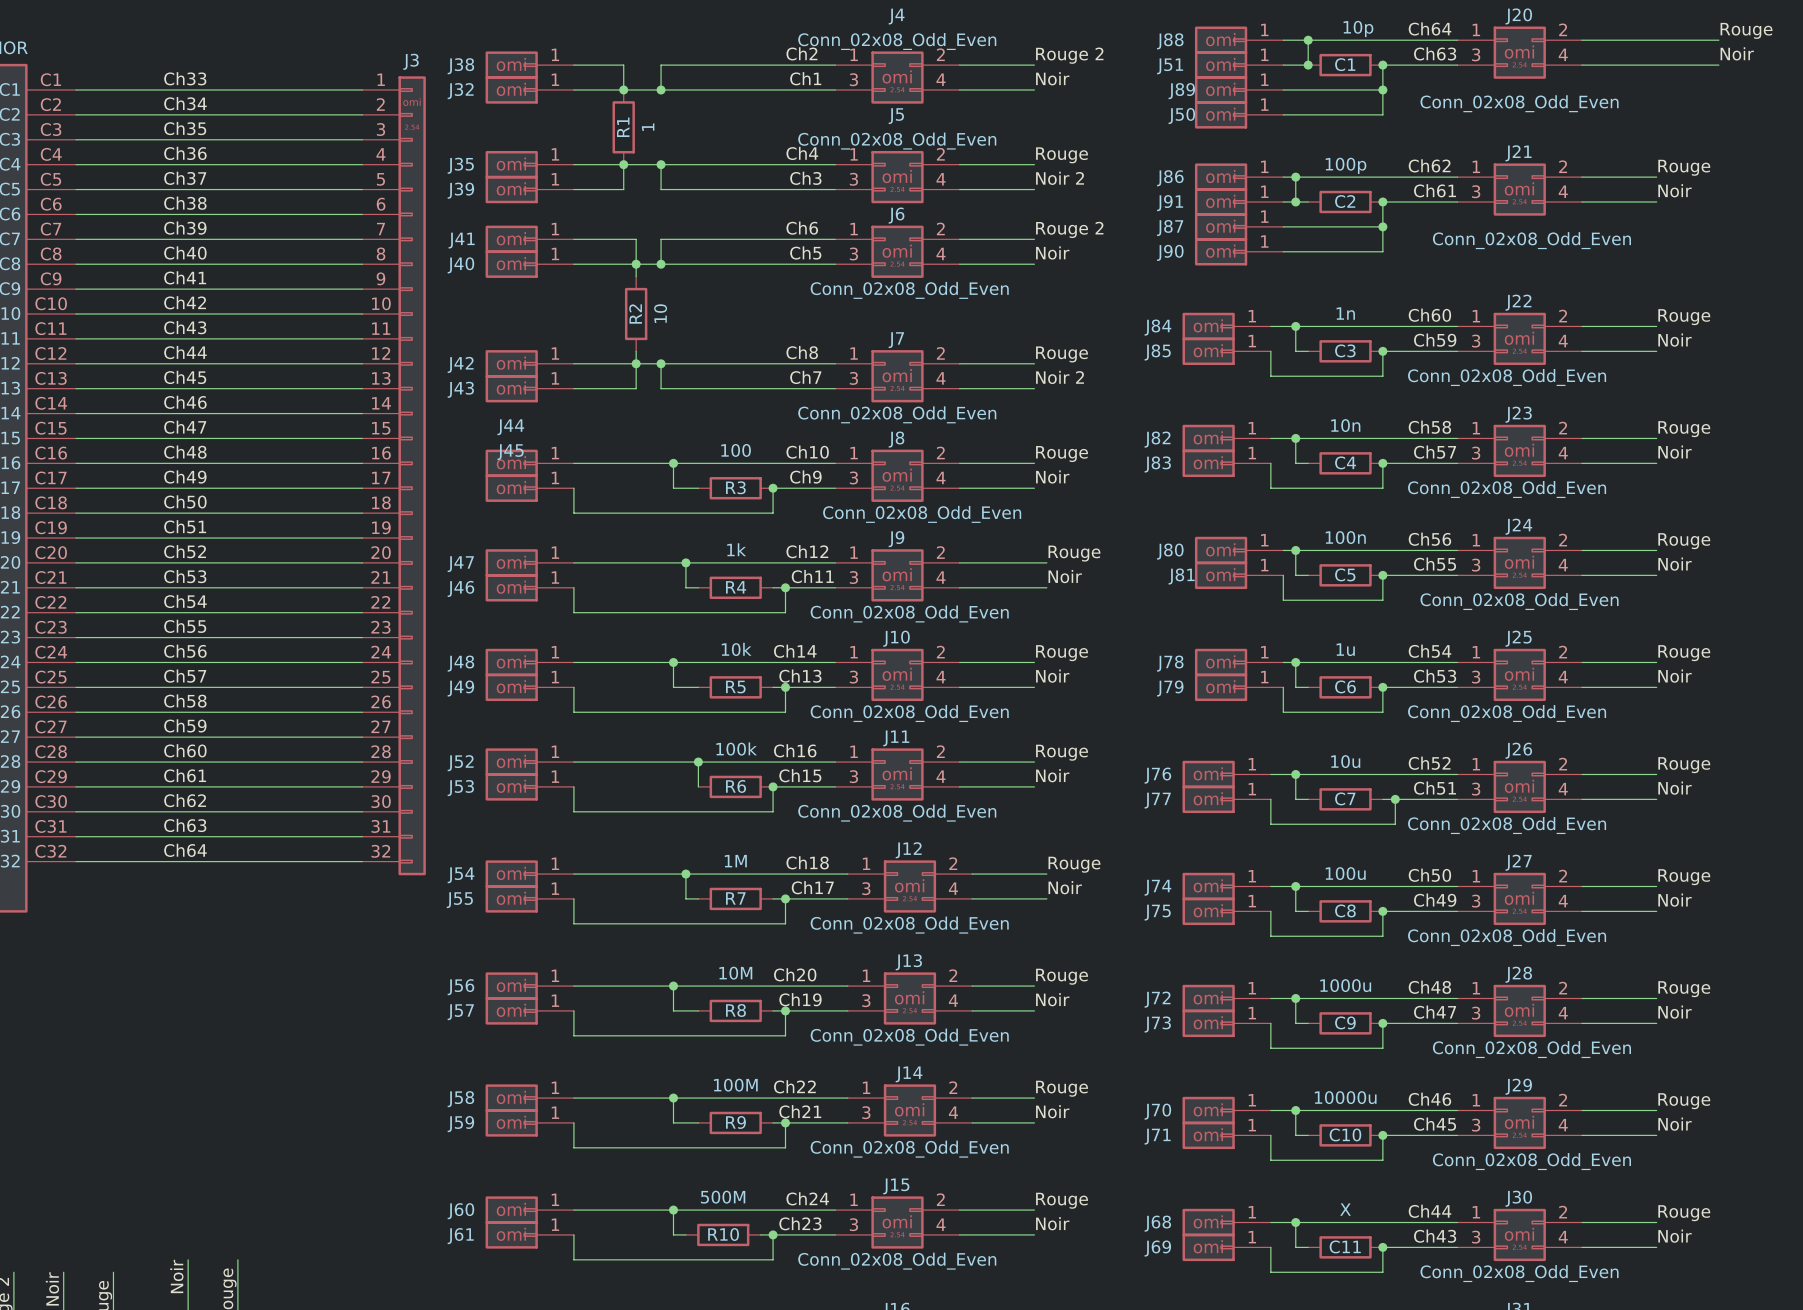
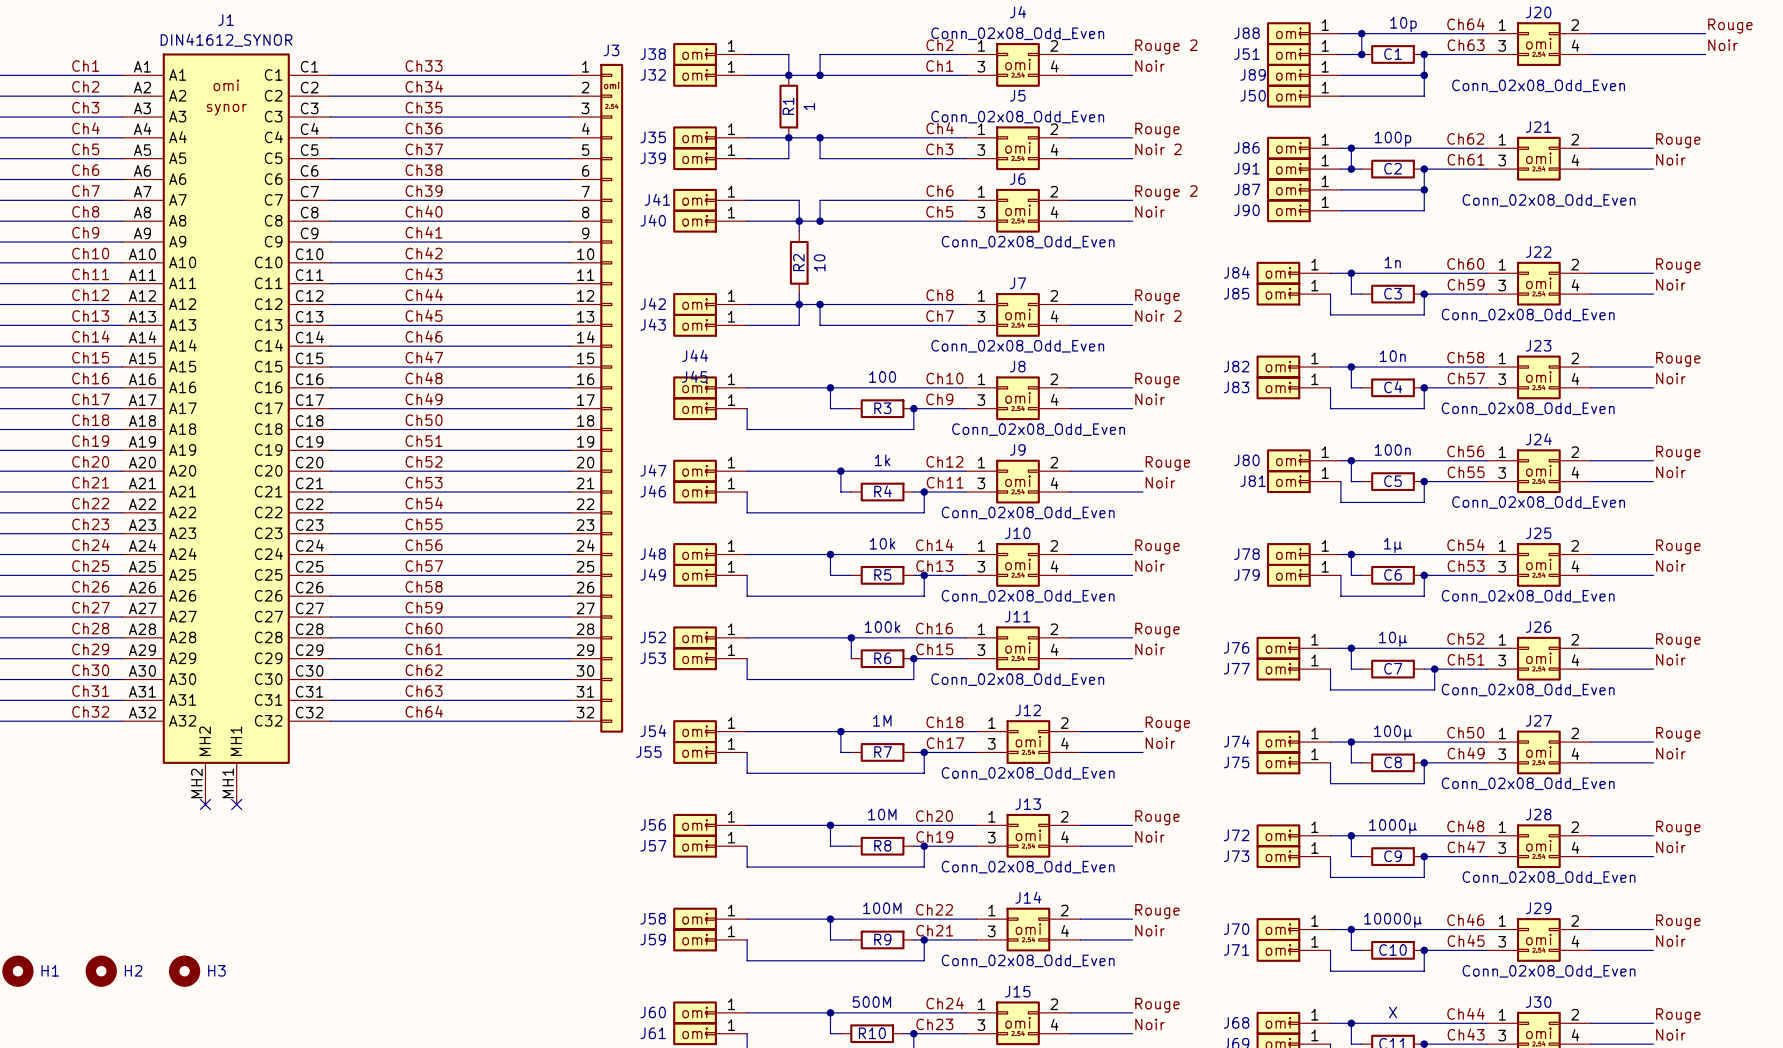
C6 value: 1u (1345, 649) -> 1µ (1393, 545)
C7 value: 10u (1345, 761) -> 10µ (1393, 639)
C8 value: 100u (1345, 873) -> 100µ (1393, 732)
C9 value: 1000u (1345, 985) -> 1000µ (1393, 826)
C10 value: 10000u (1345, 1097) -> 10000µ (1393, 920)

